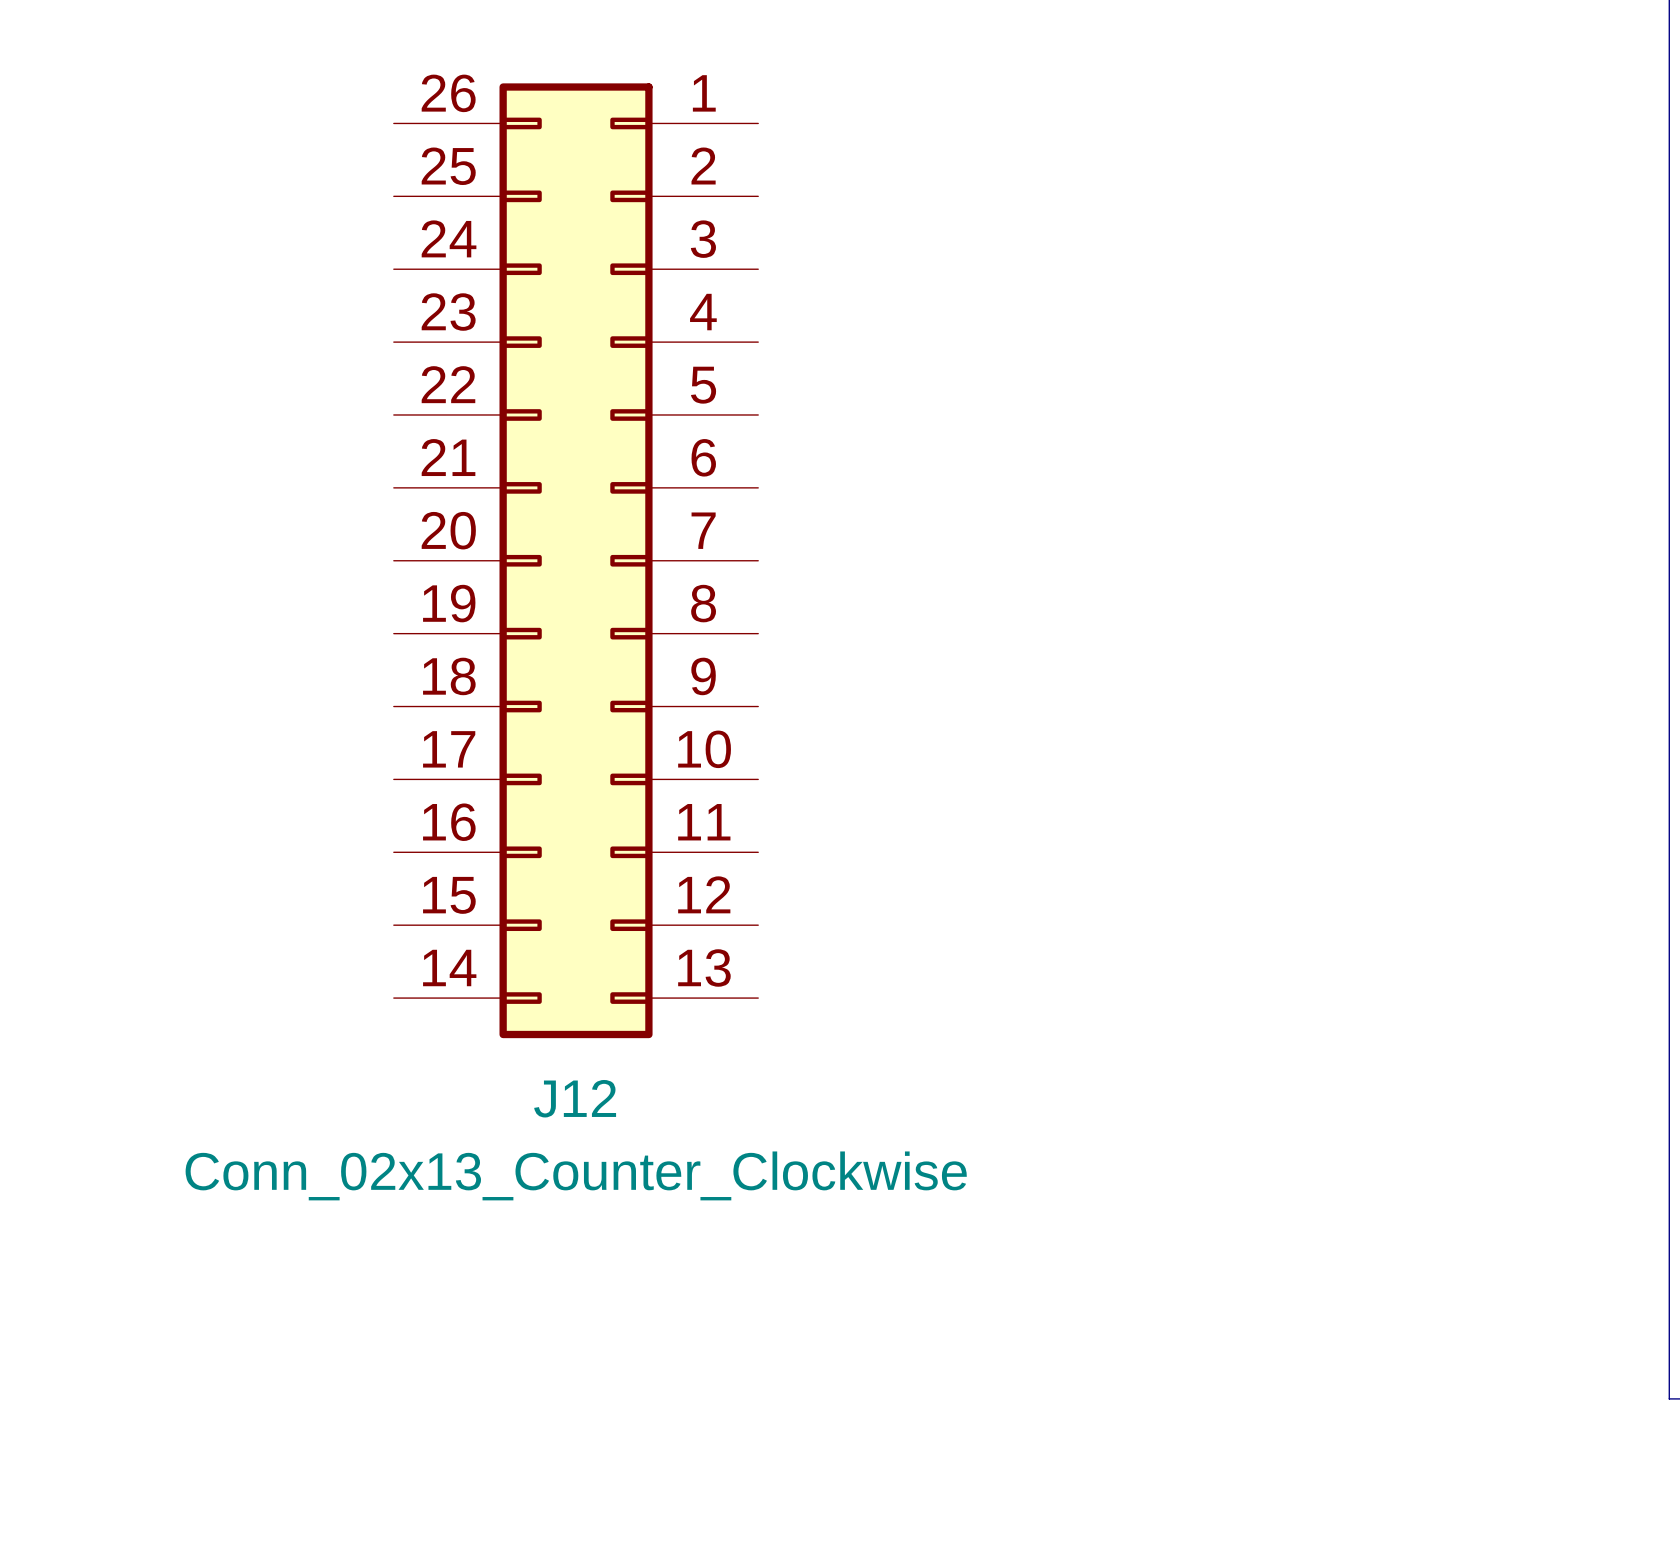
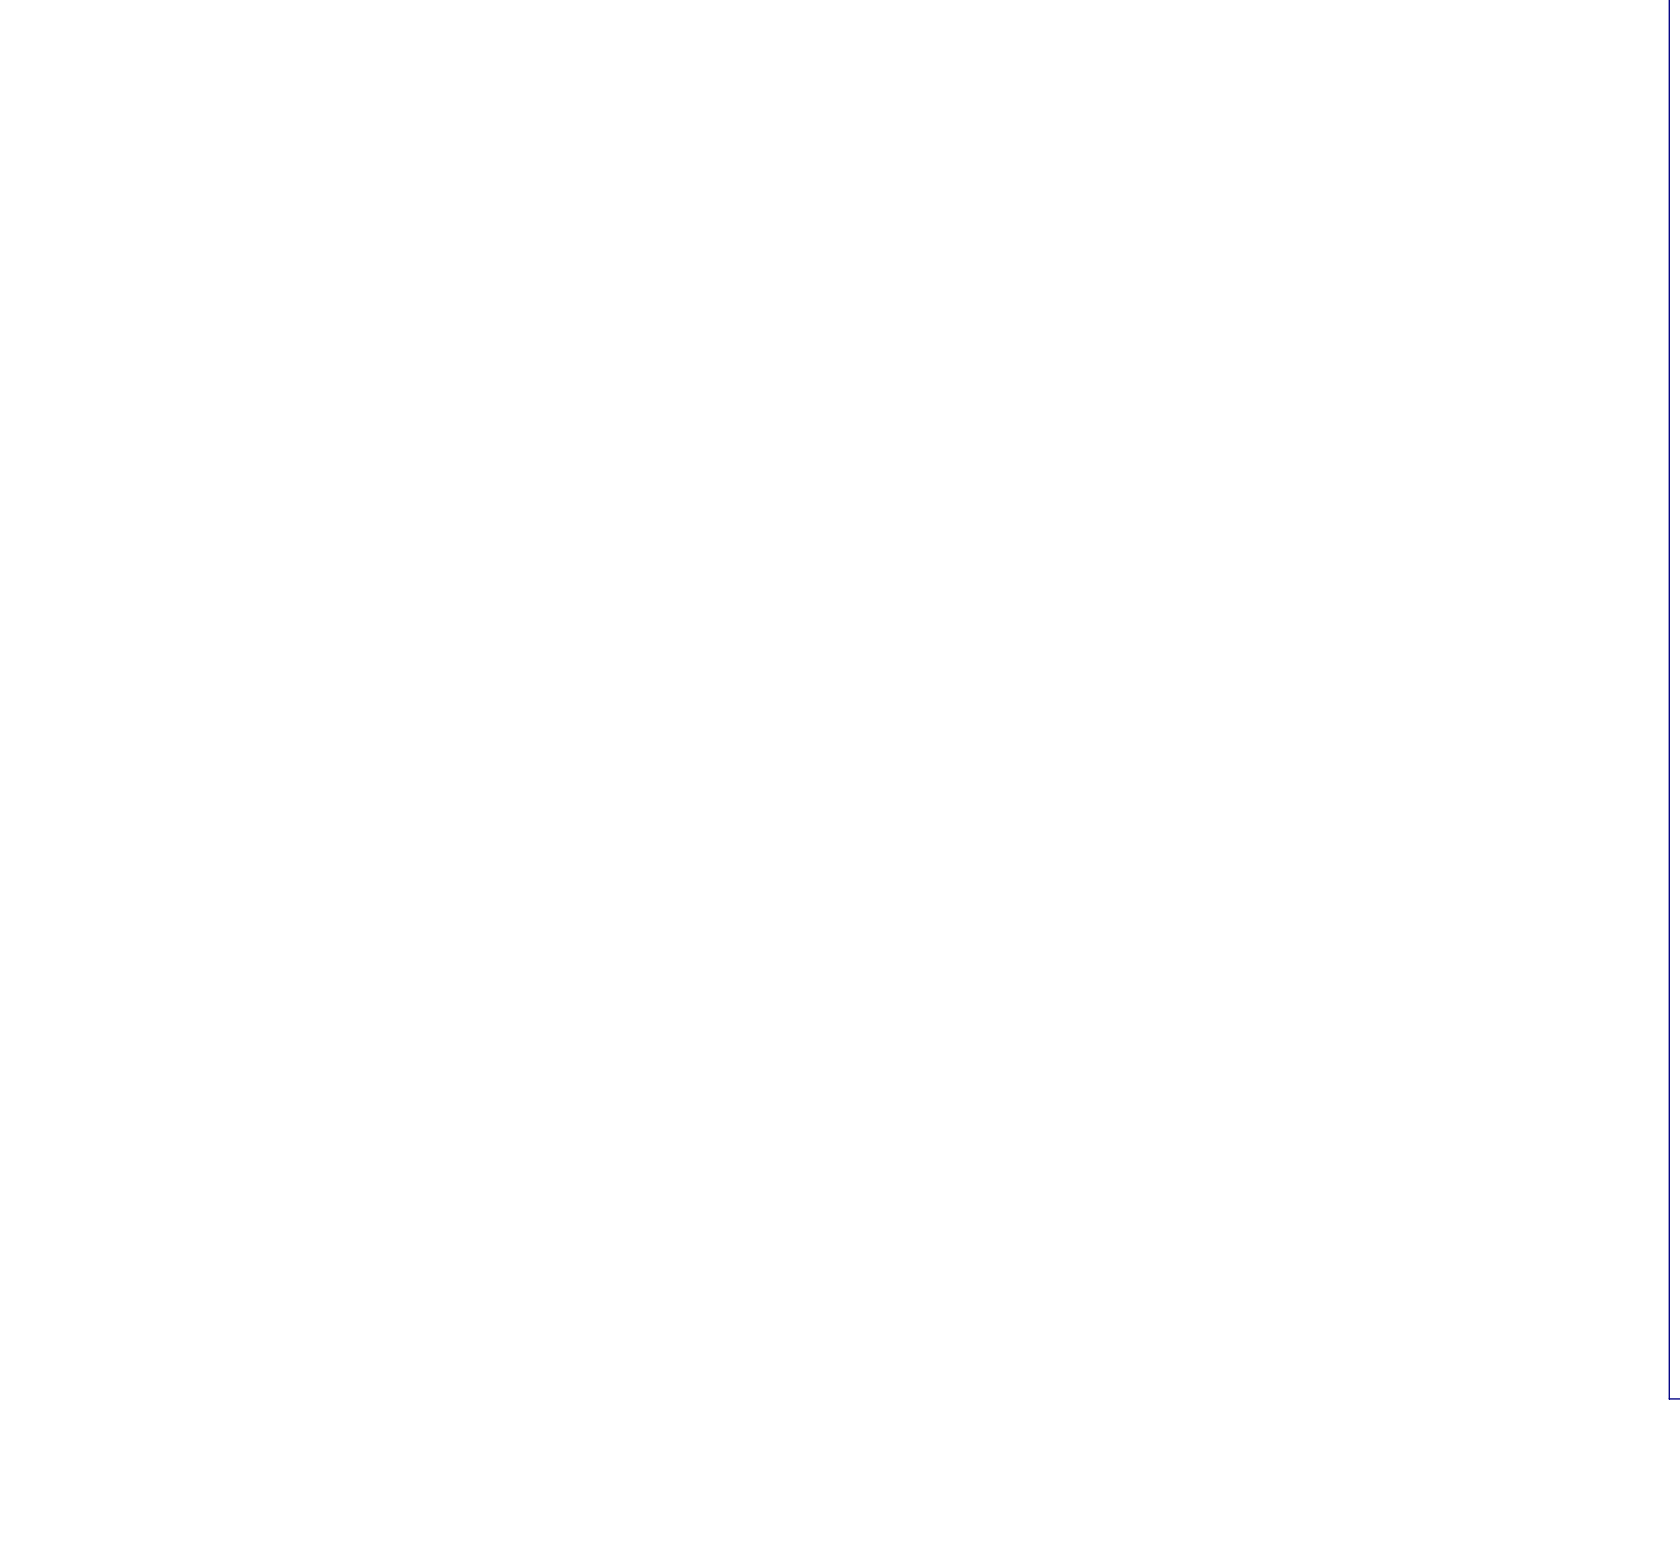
J12: Conn_02x13_Counter_Clockwise (576, 560) -> none

